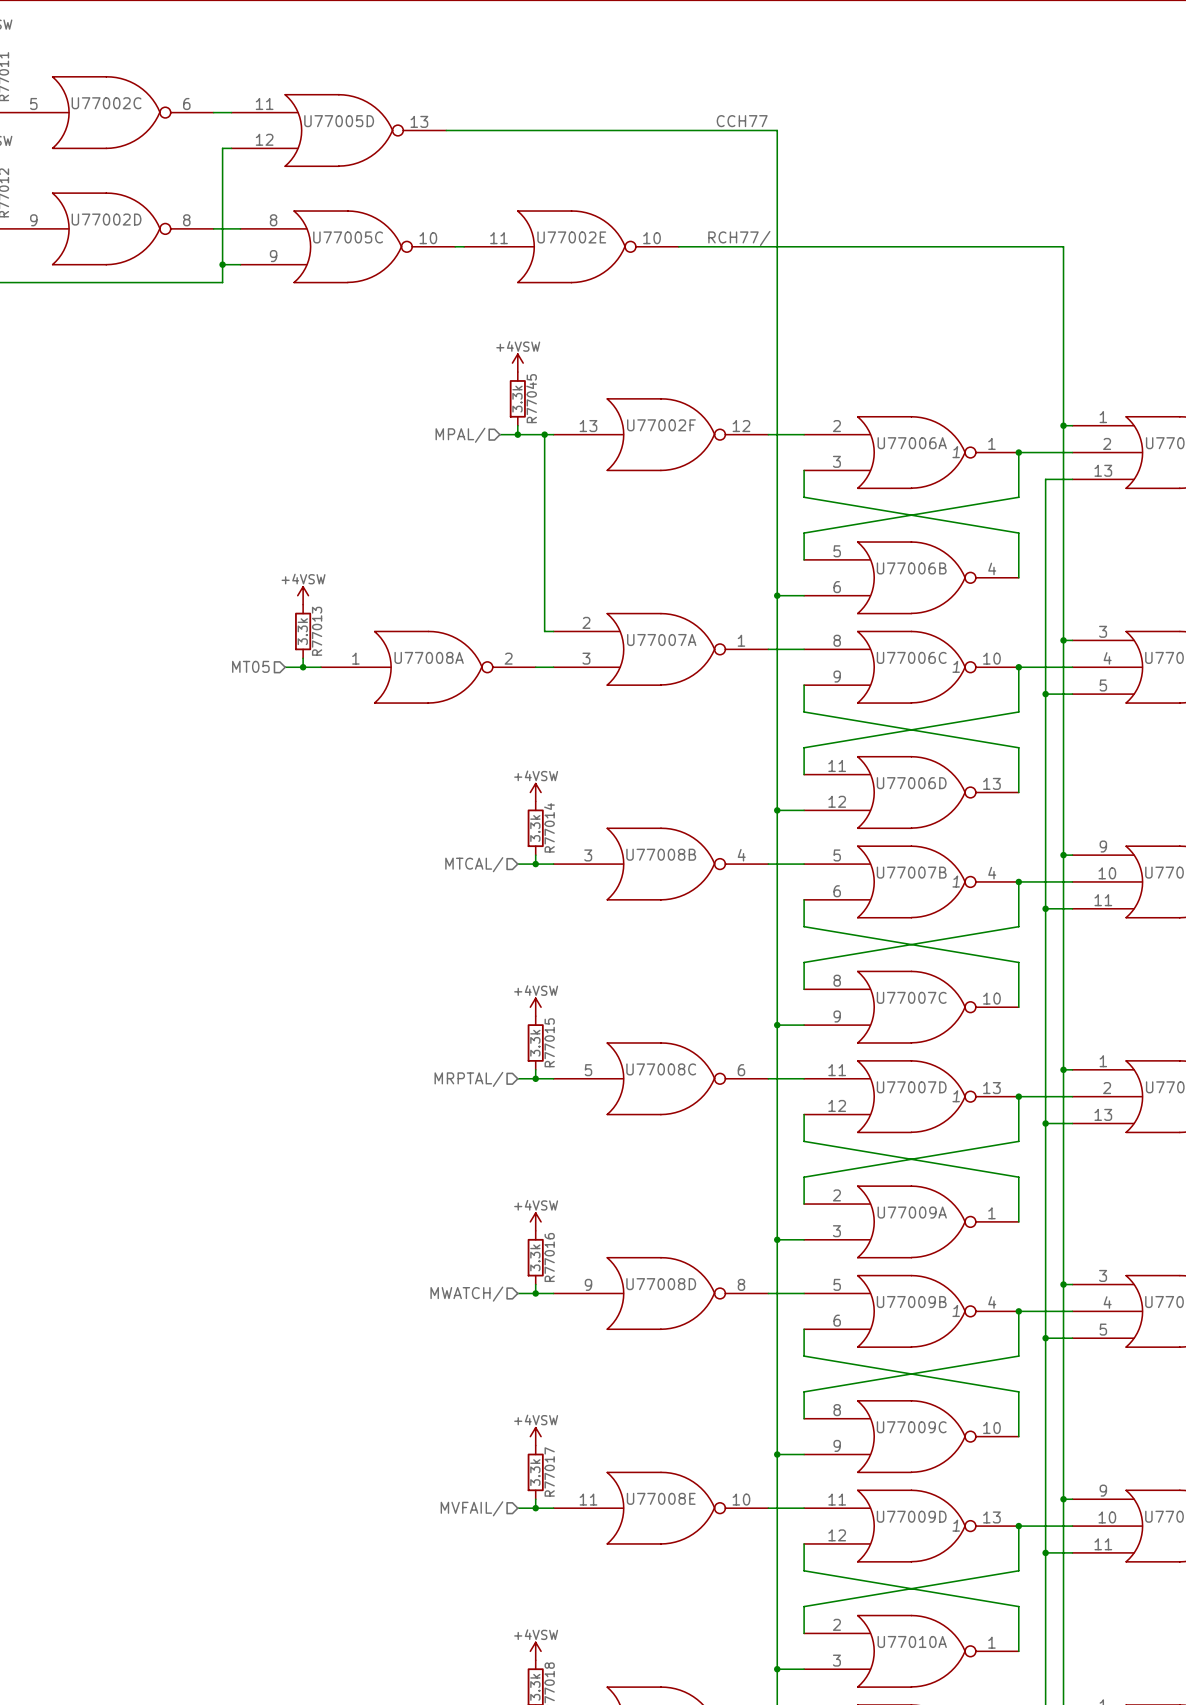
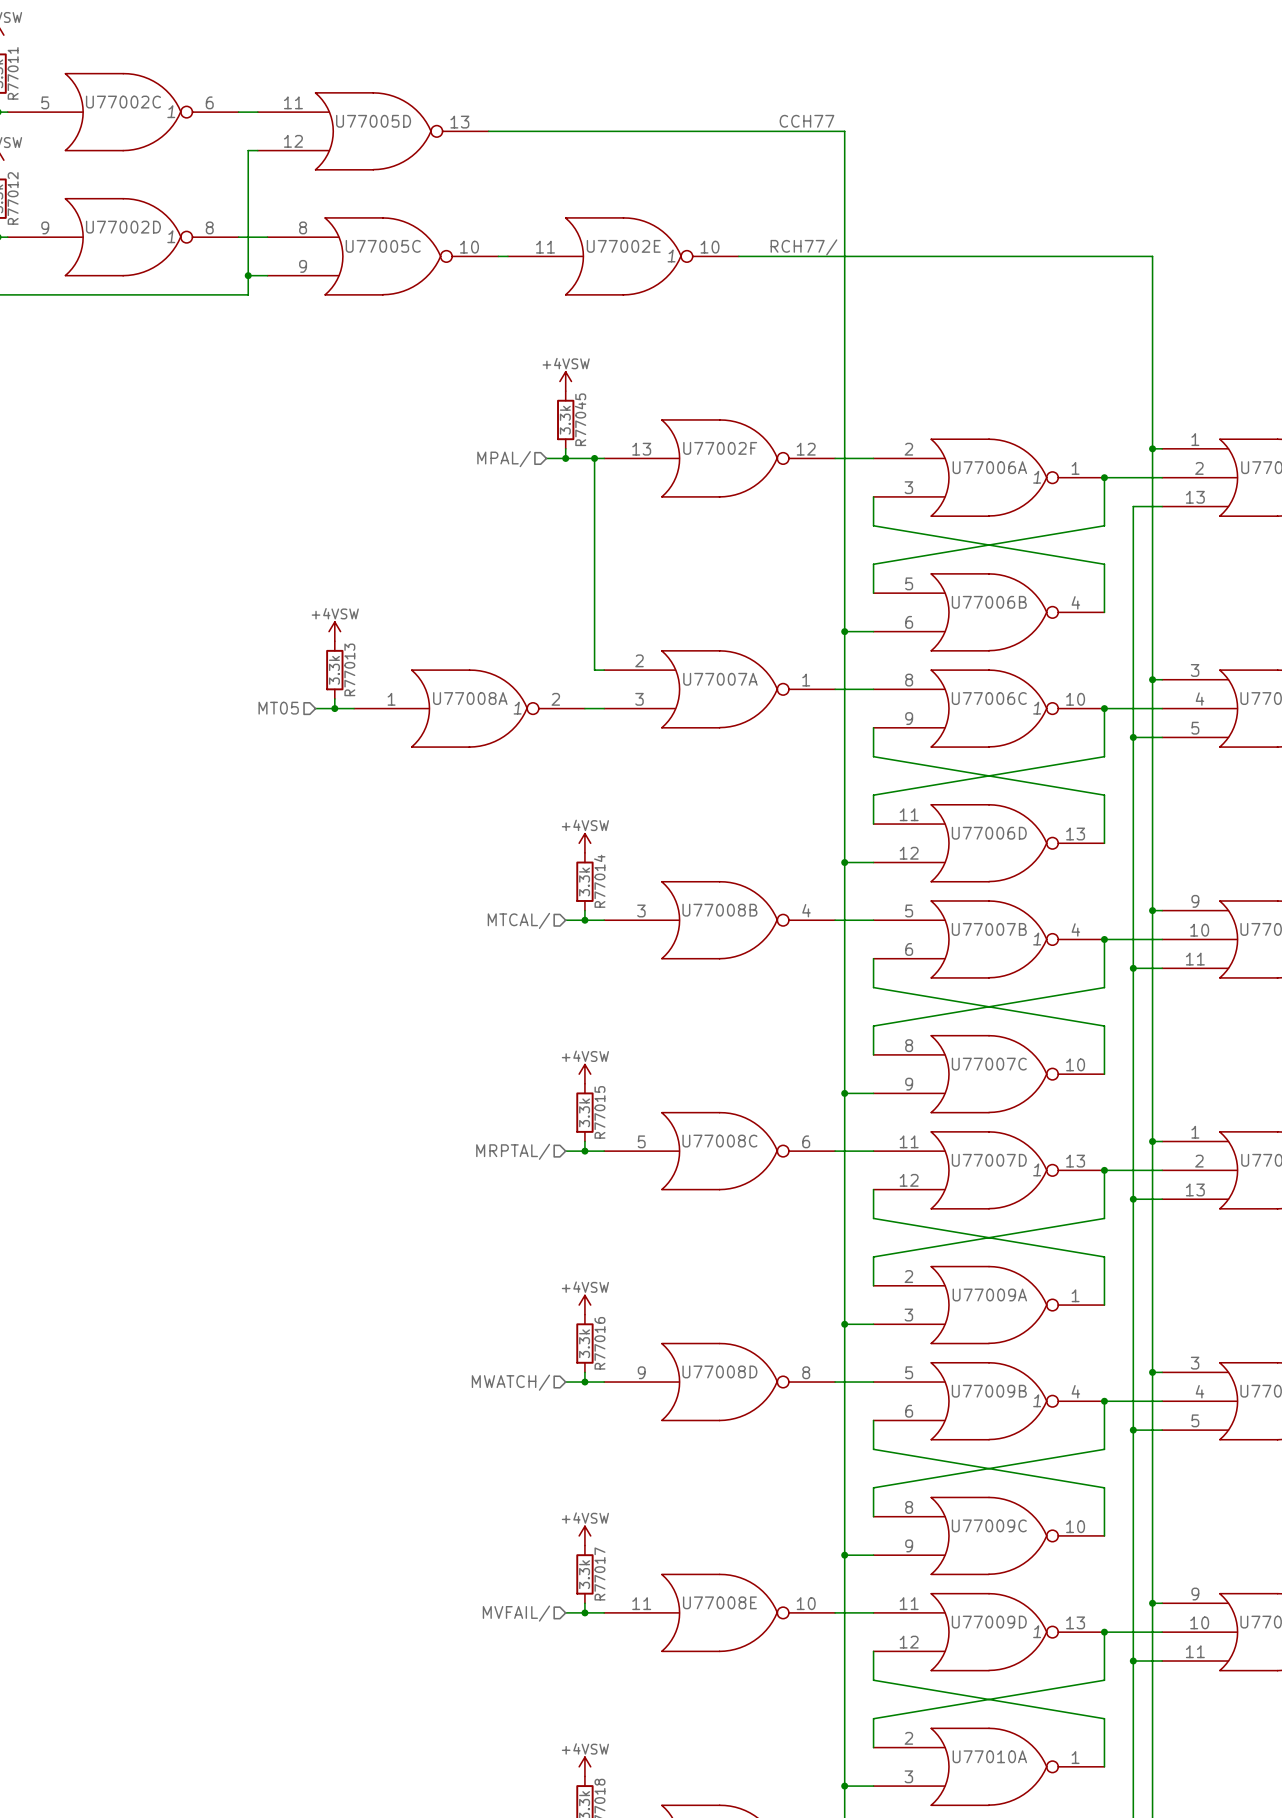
U77002C text: none -> 1 (171, 111)
U77002D text: none -> 1 (171, 236)
U77002E text: none -> 1 (671, 255)
U77008A text: none -> 1 (517, 708)

